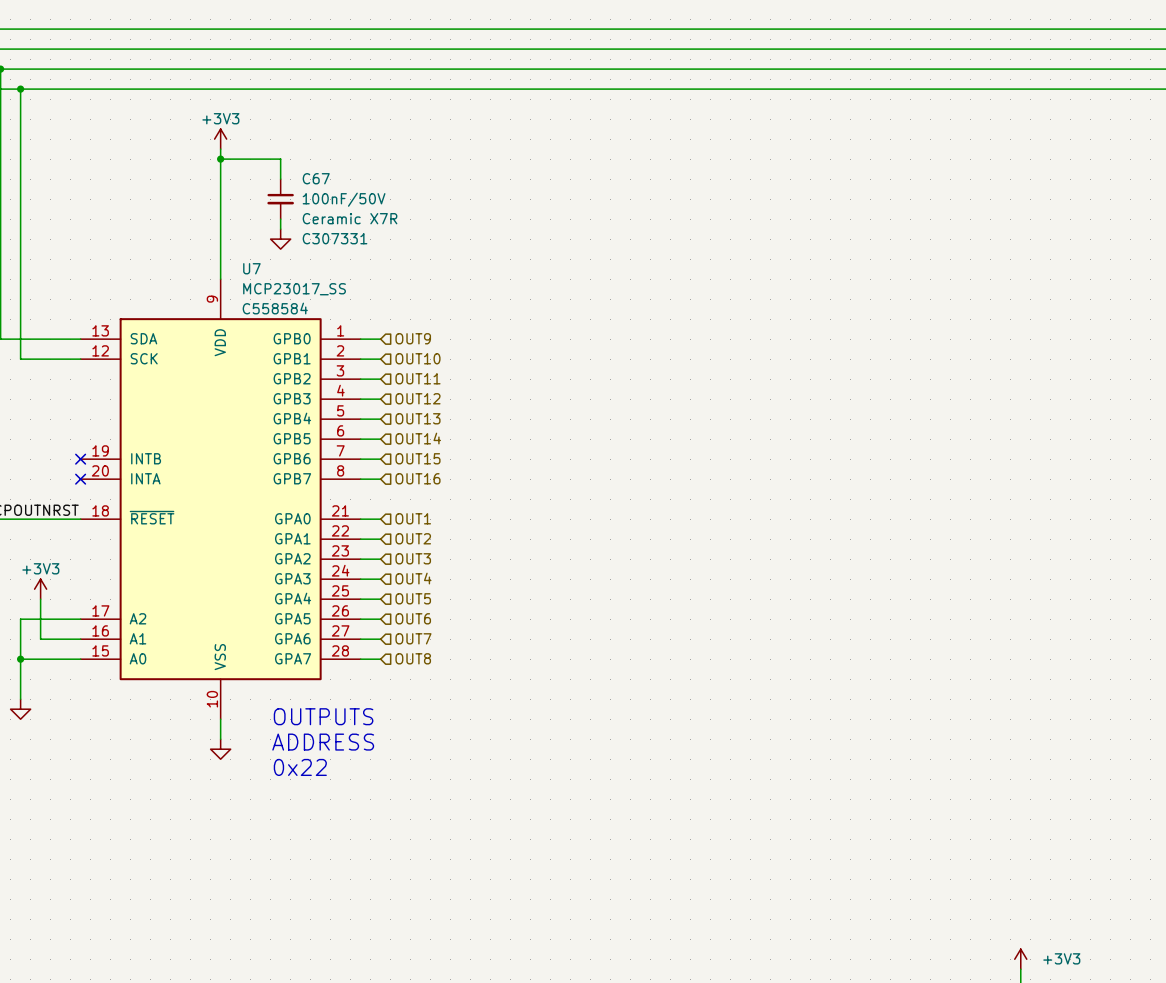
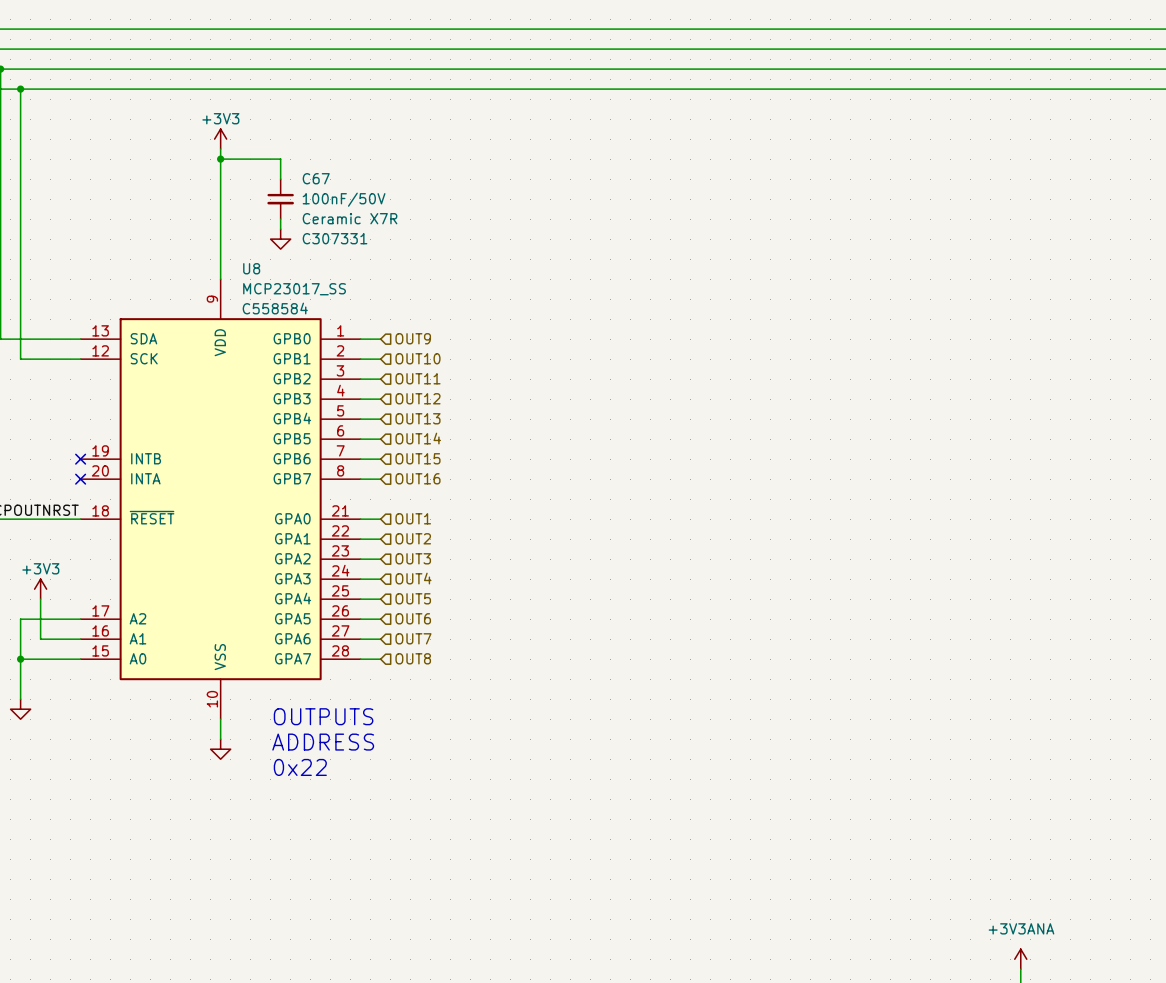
U7 name: U7 (251, 268) -> U8 (251, 268)
power symbol: +3V3 (1020, 959) -> +3V3ANA (1020, 959)

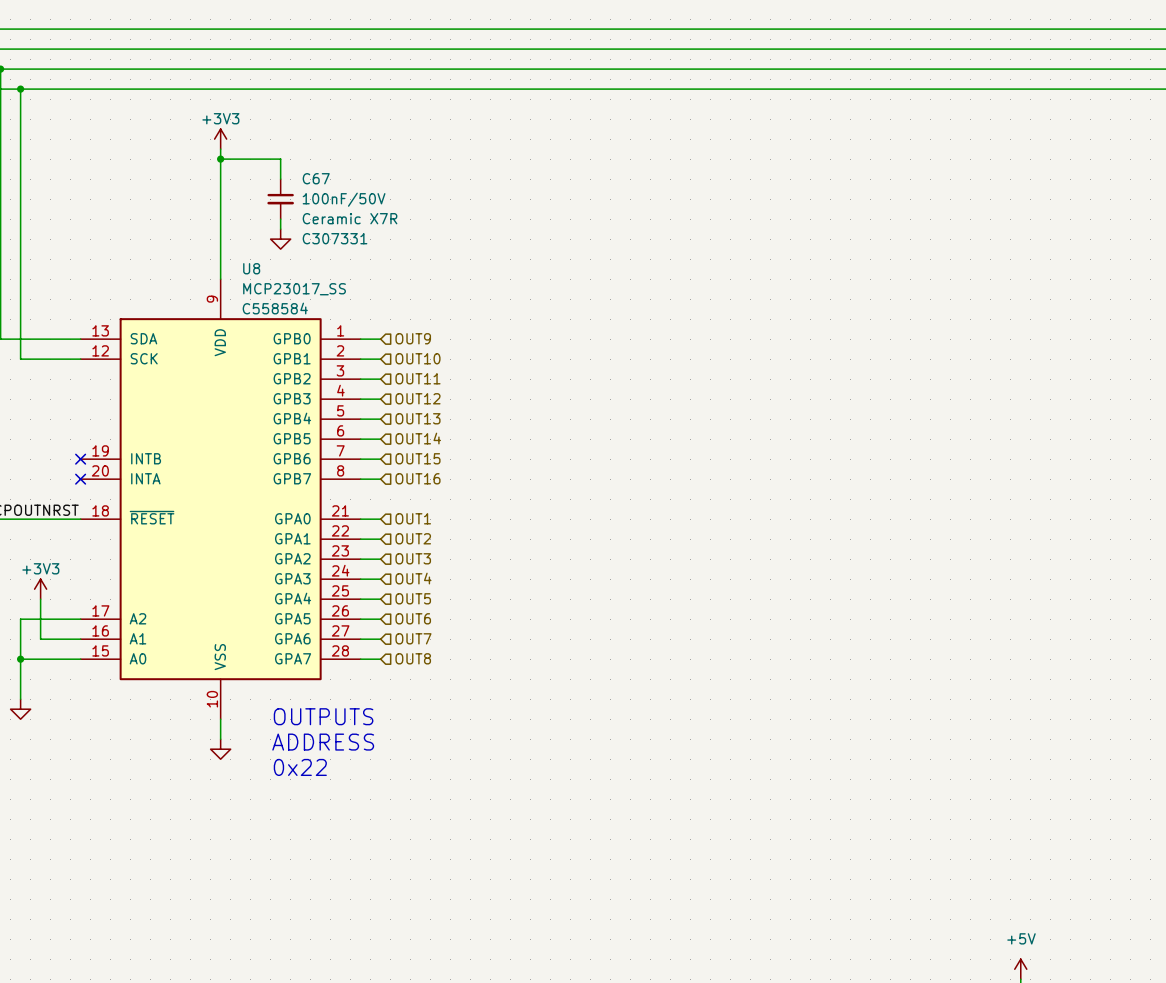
power symbol: +3V3ANA (1020, 959) -> none
power symbol: none -> +5V (1020, 969)

